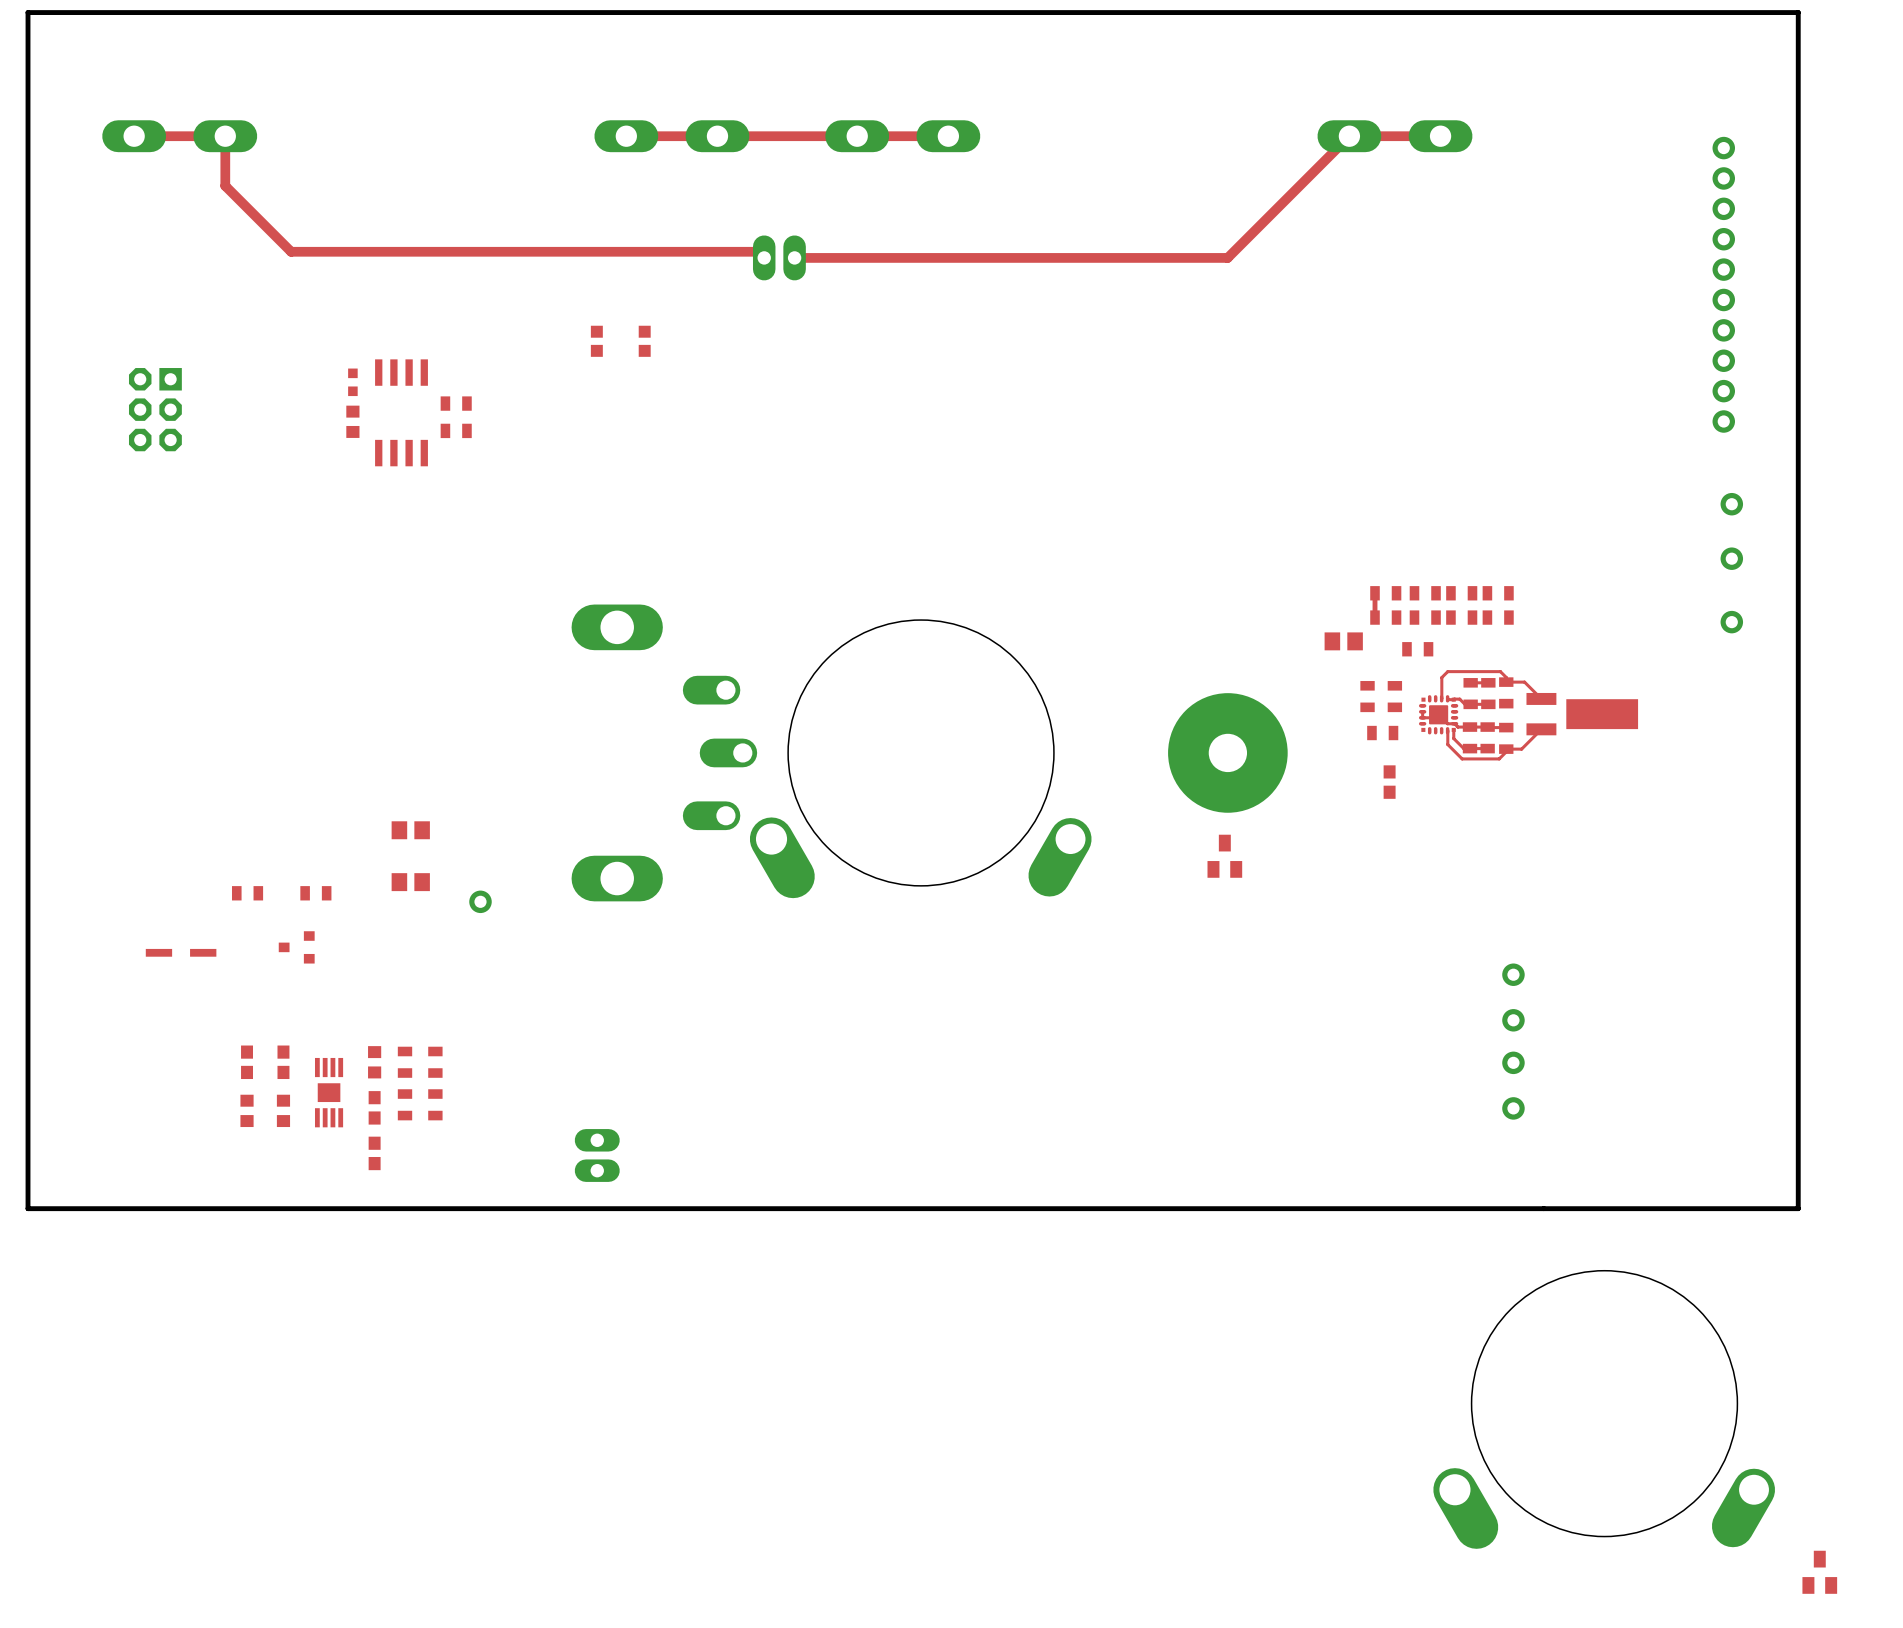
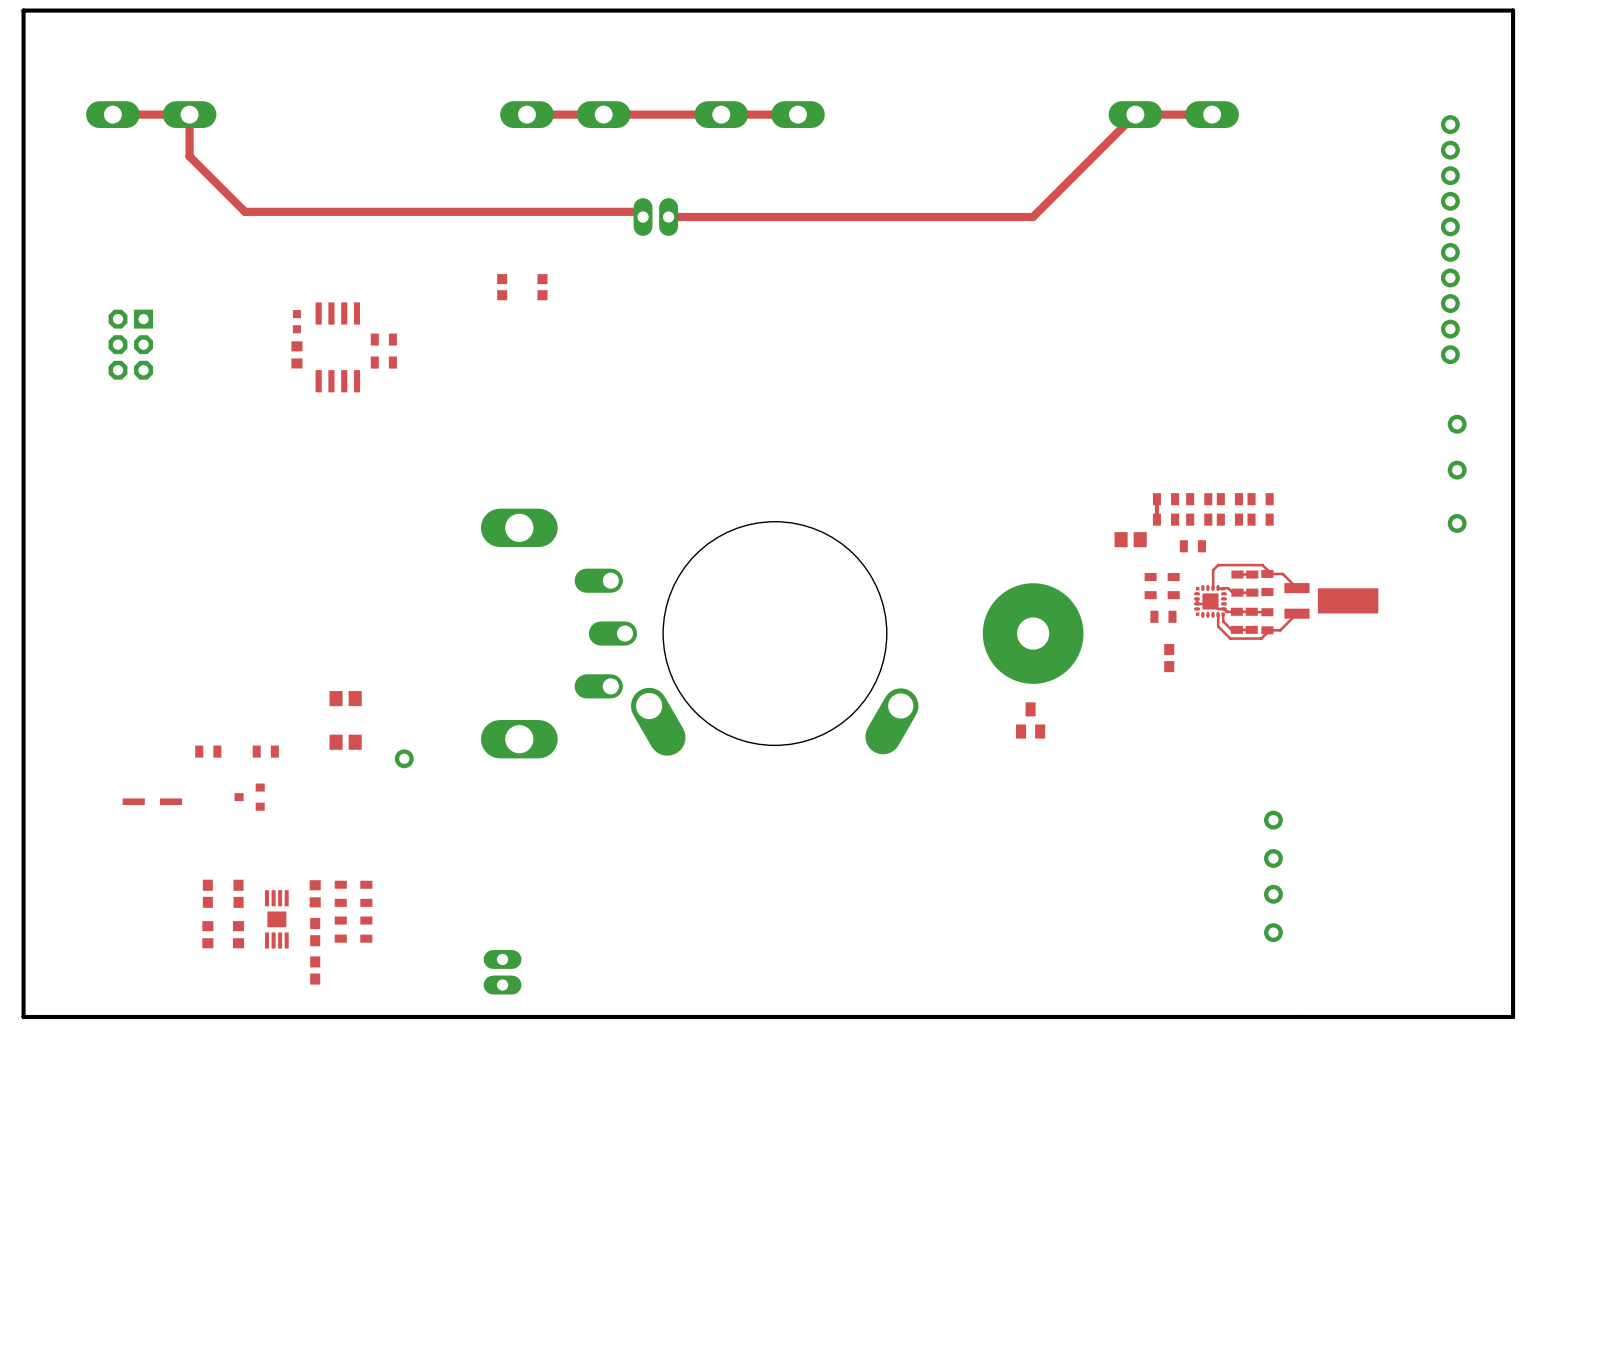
part: (1604, 1409) -> none
part: (1819, 1572) -> none

